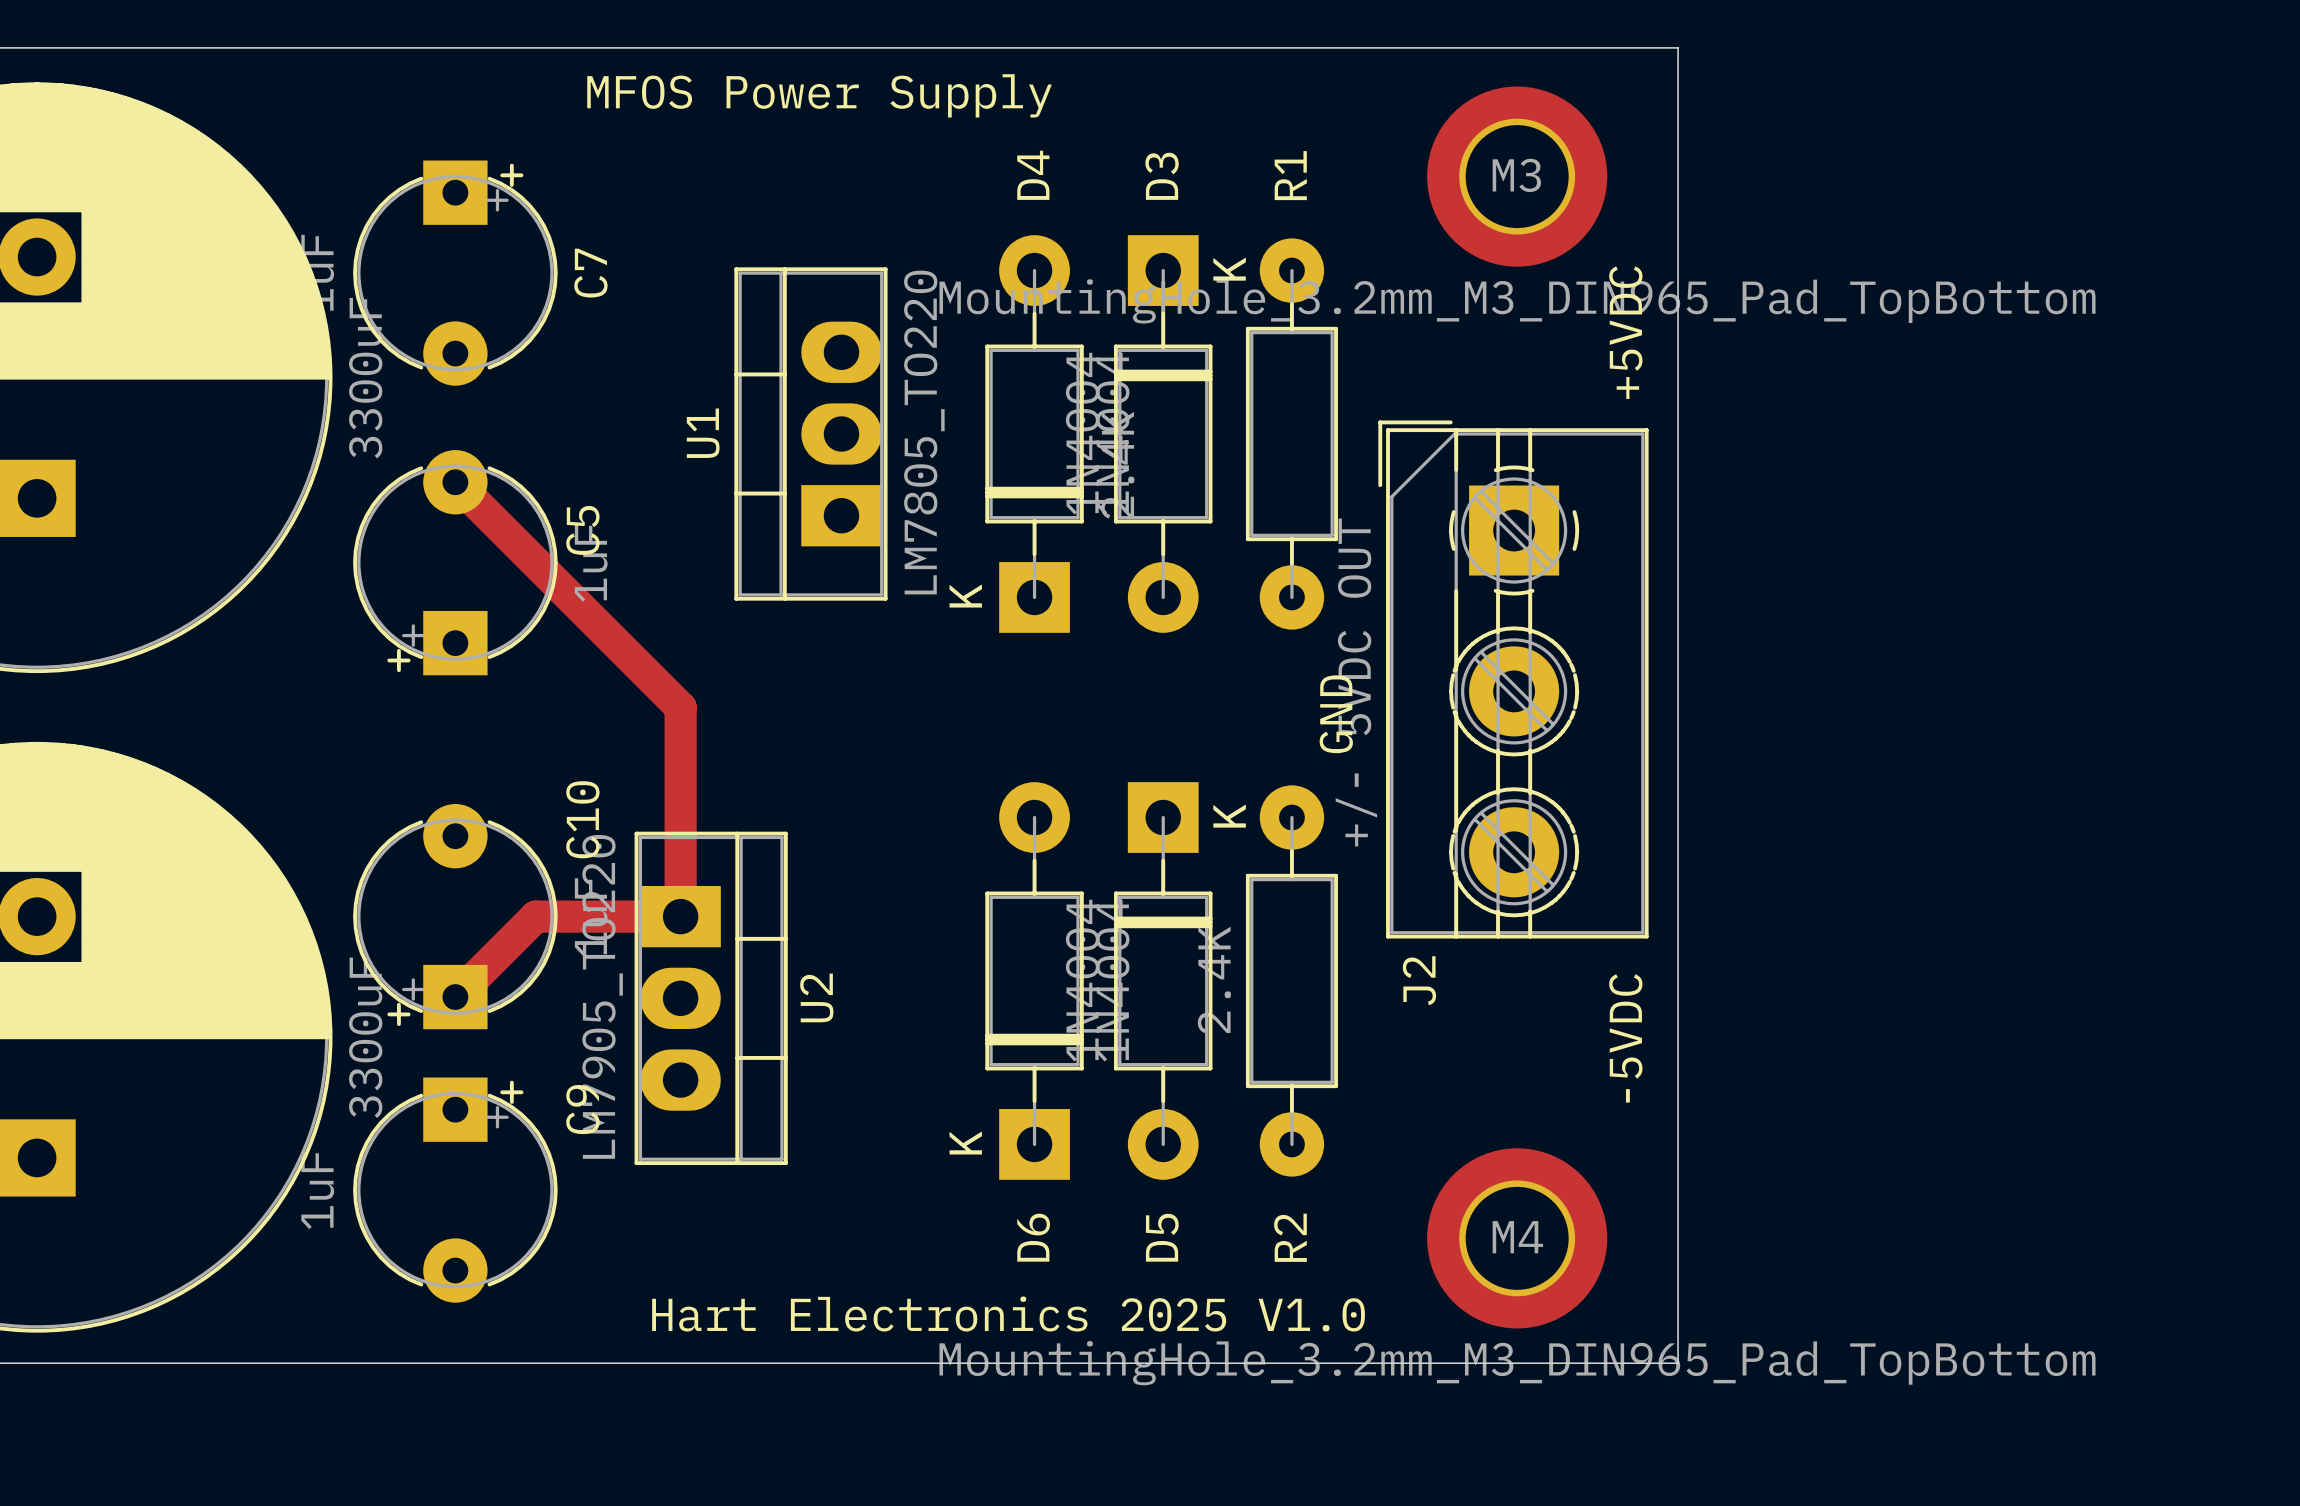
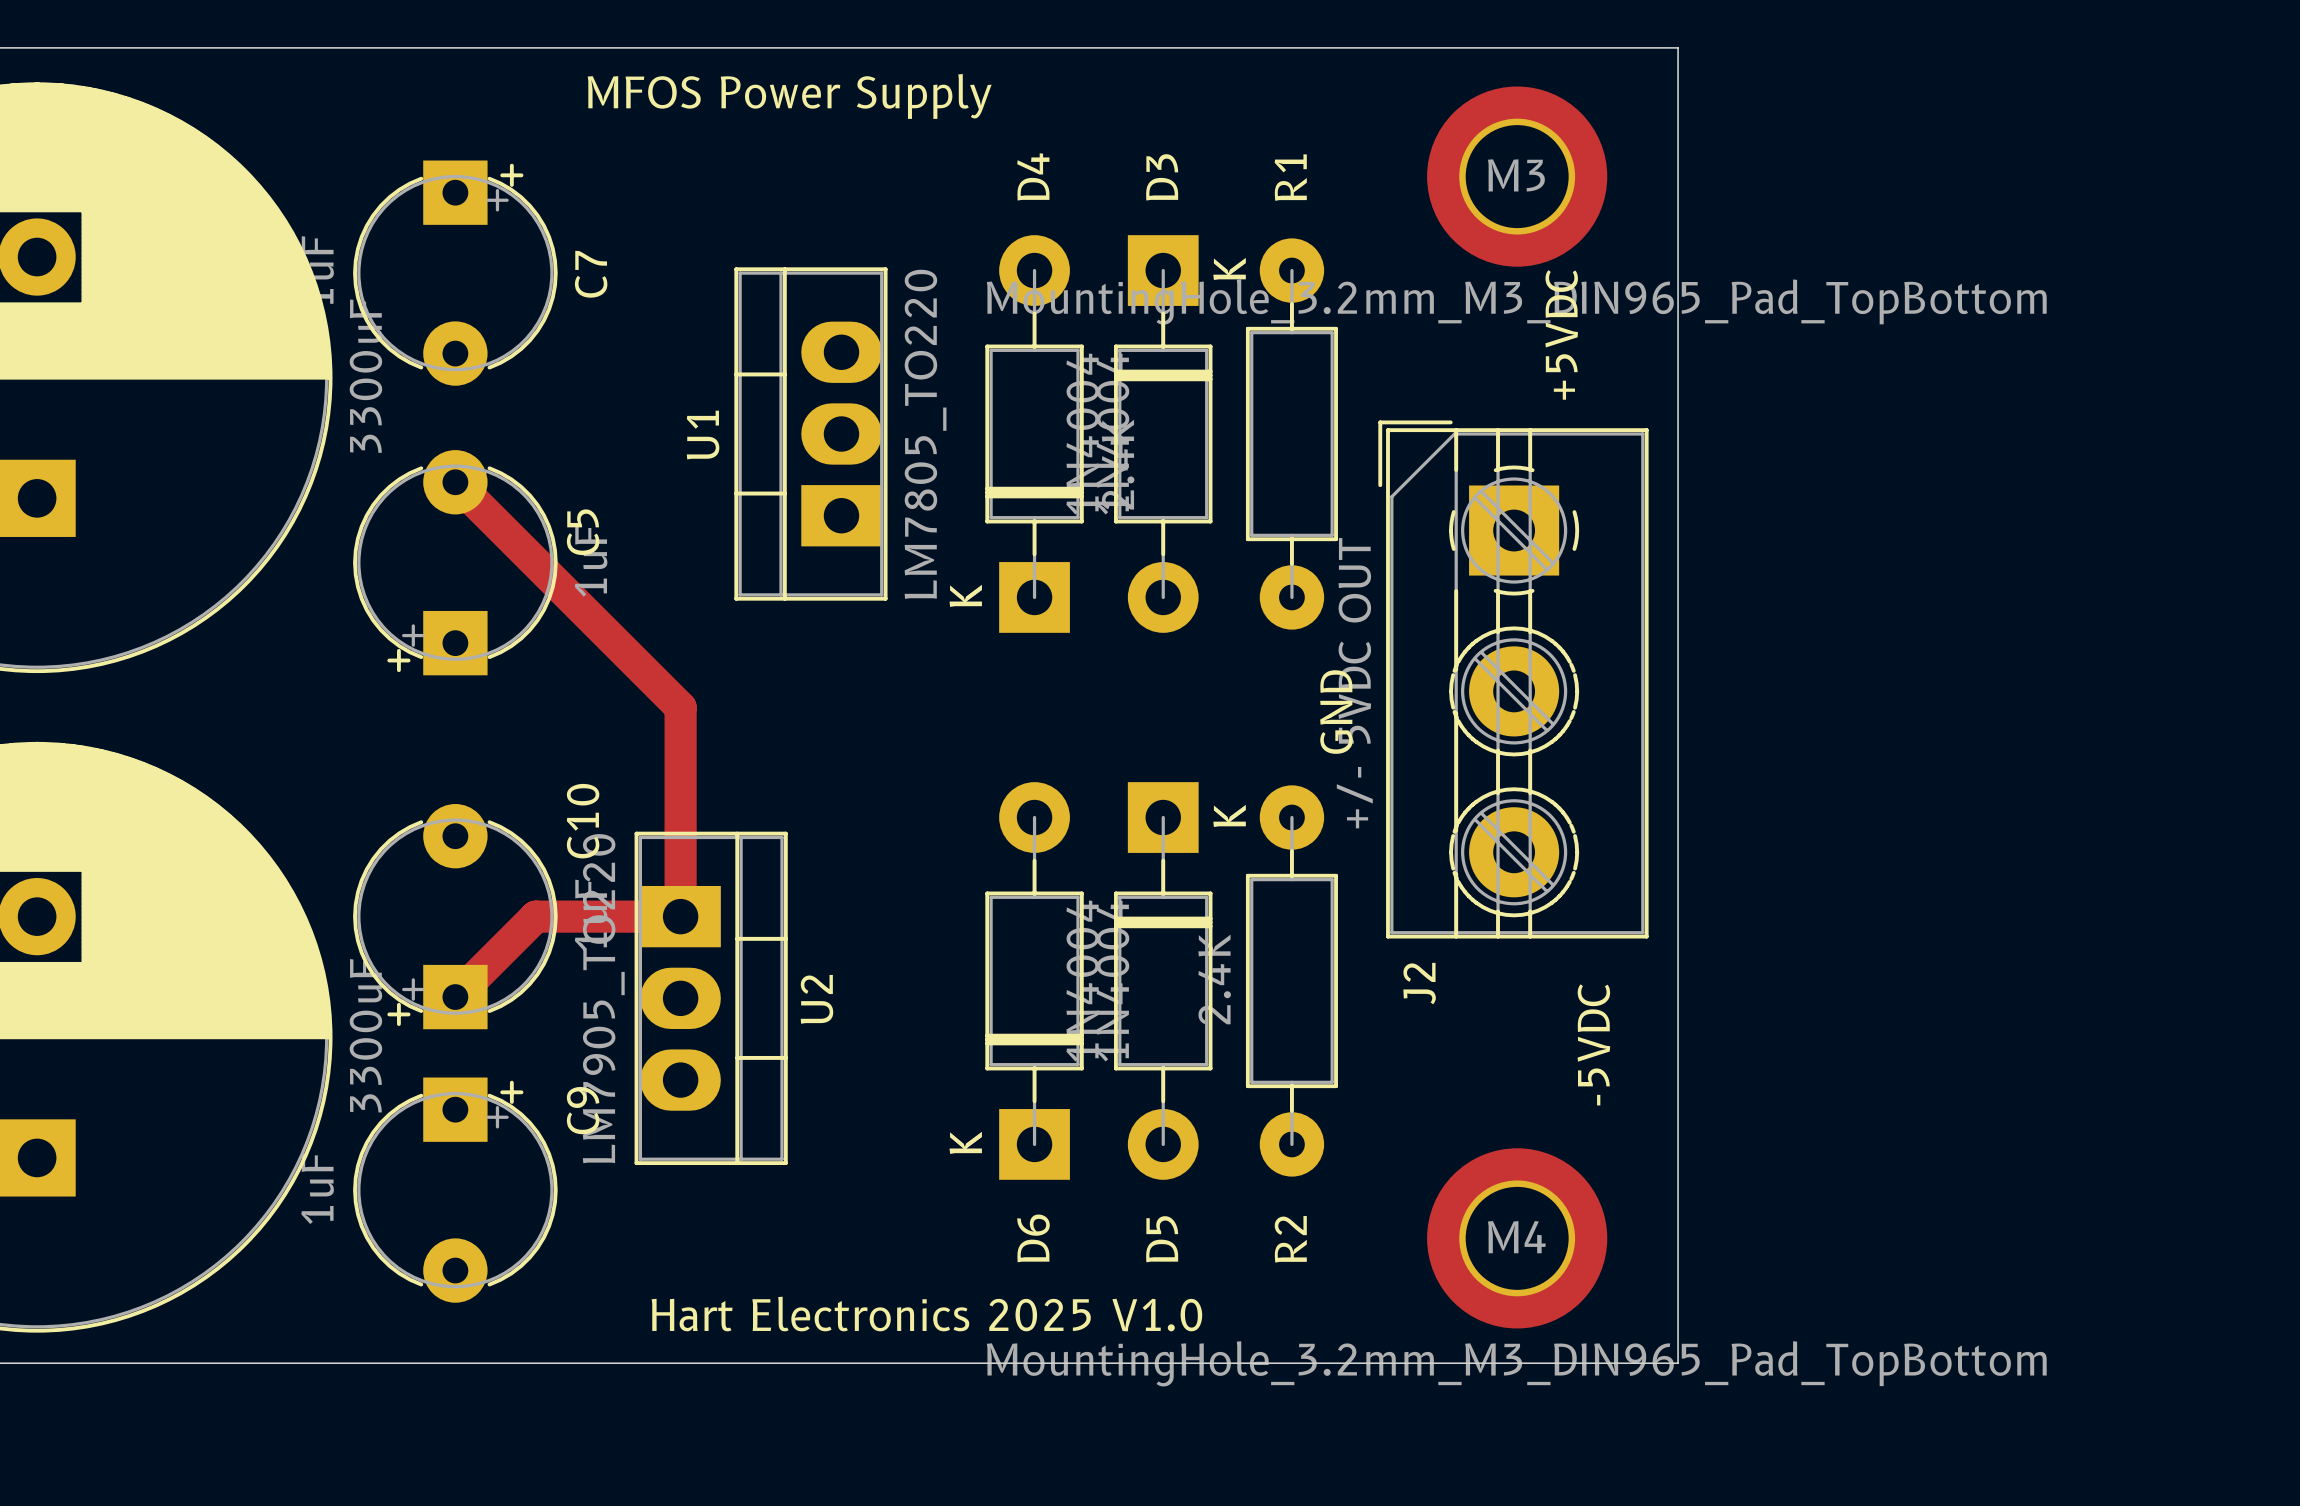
text position: +5VDC (1625, 332) -> +5VDC (1561, 334)
text position: -5VDC (1625, 1038) -> -5VDC (1593, 1044)

